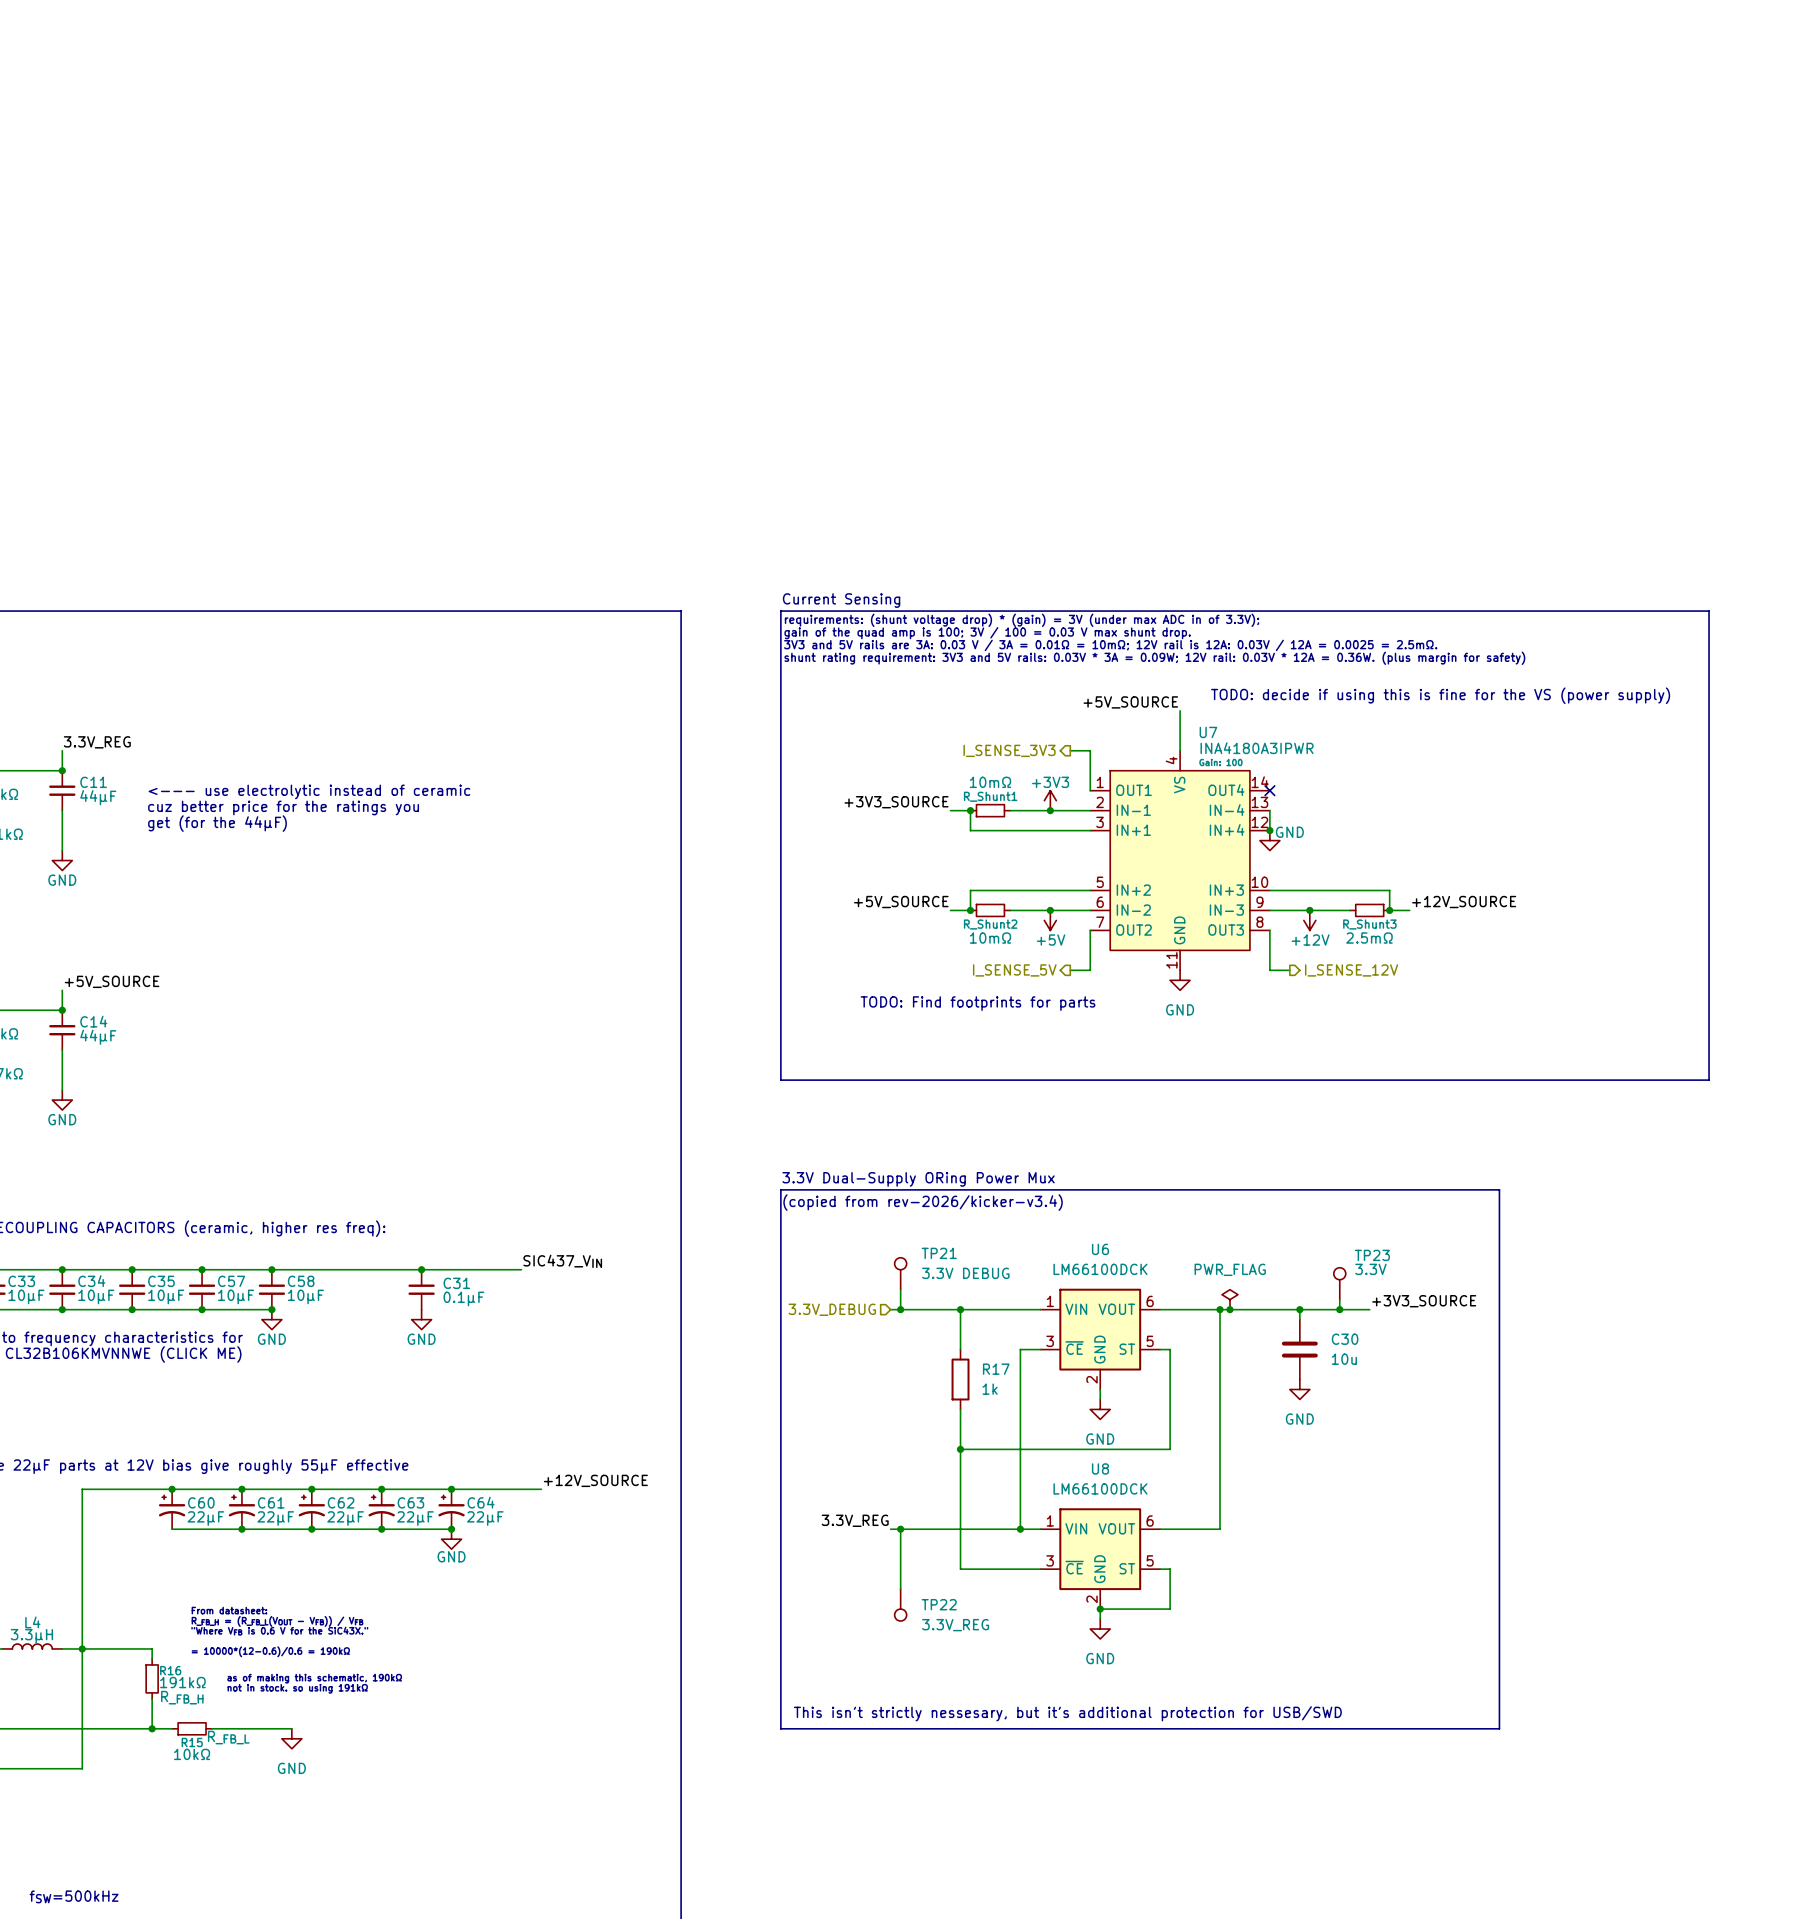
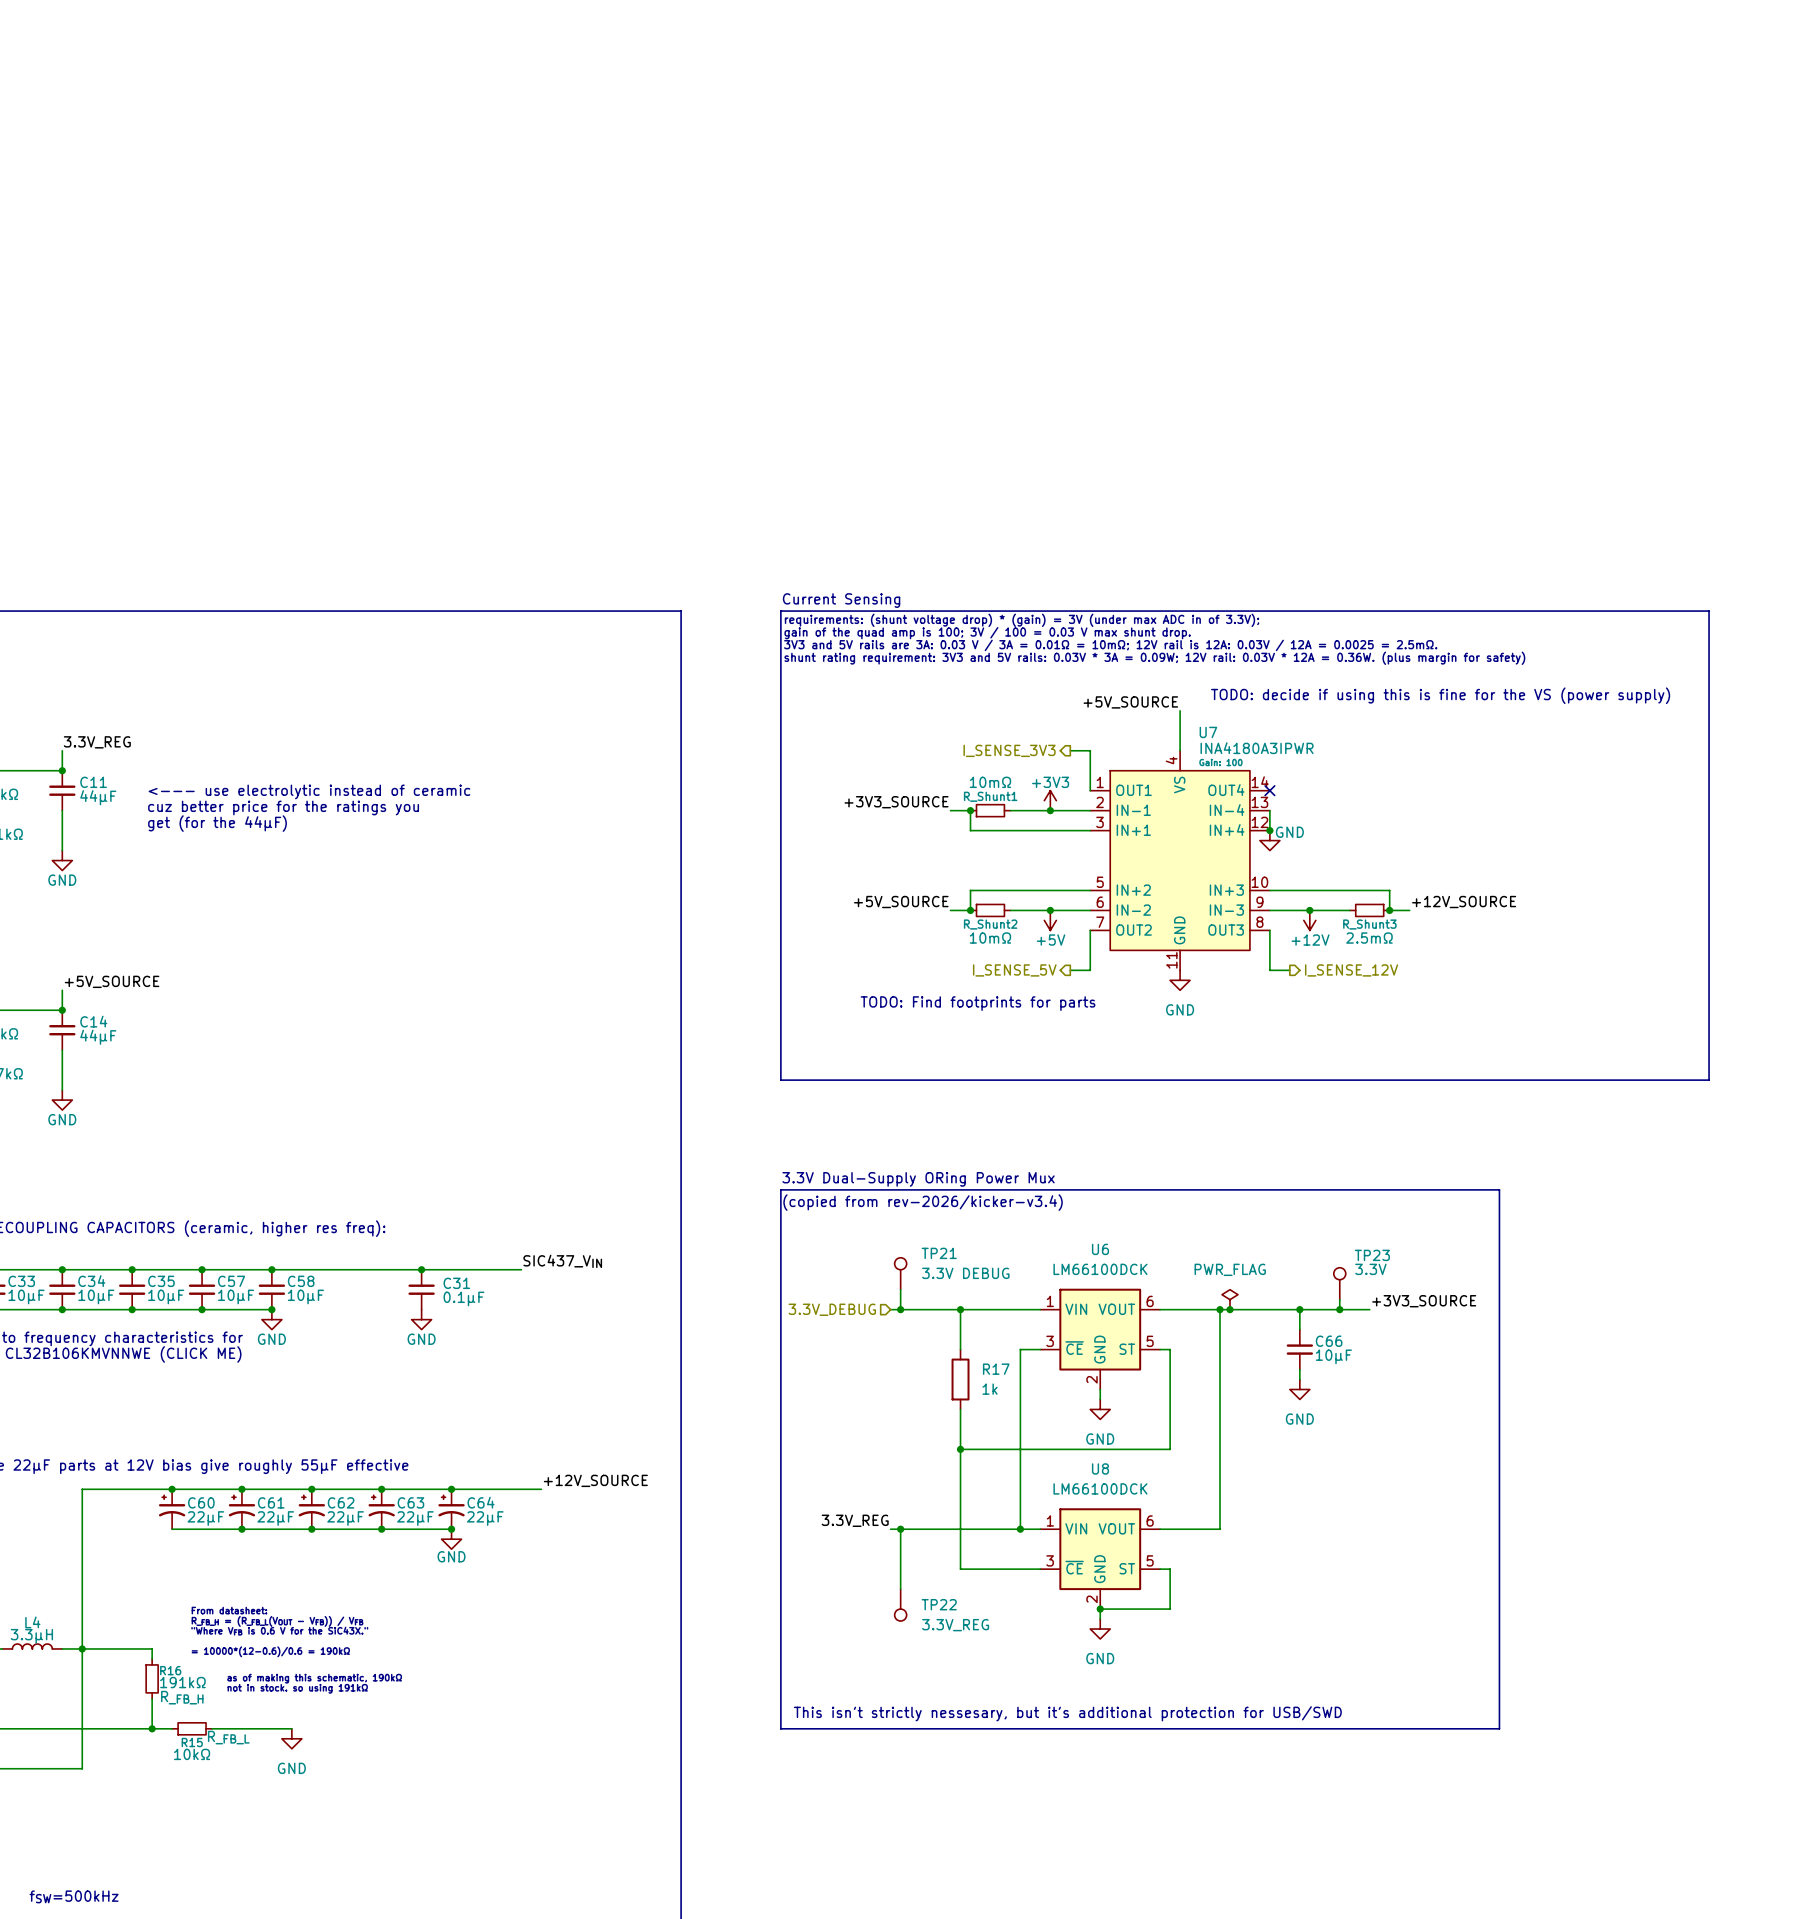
C30: 10u (1299, 1349) -> none
C66: none -> 10µF (1299, 1349)

